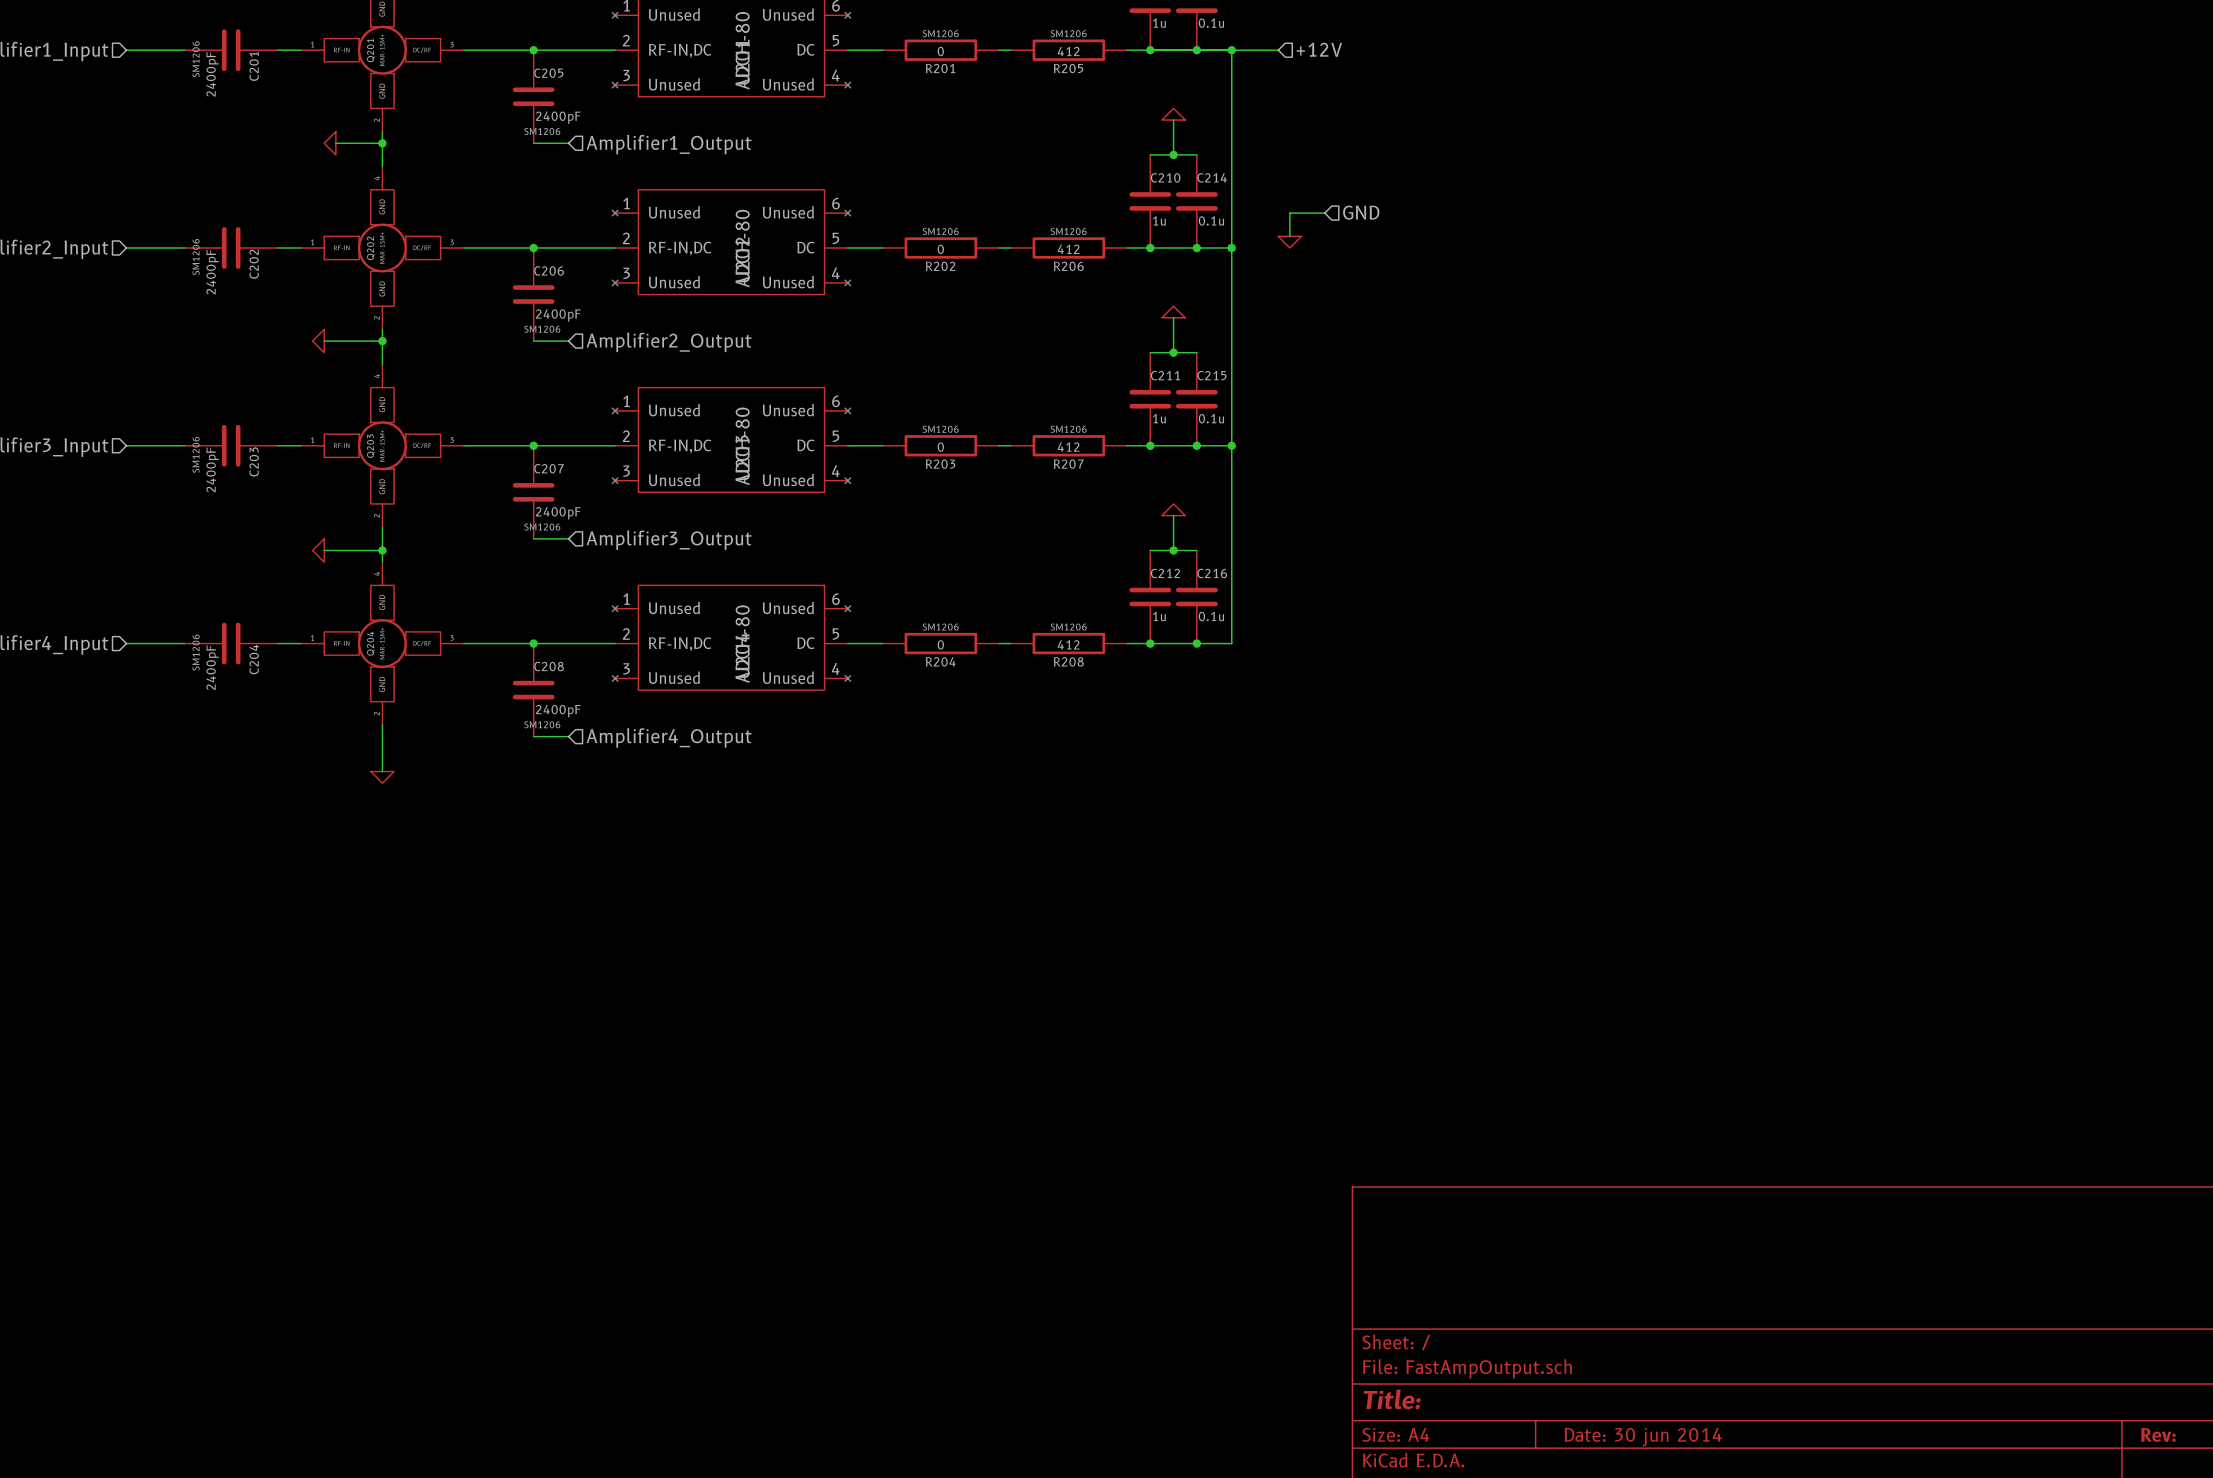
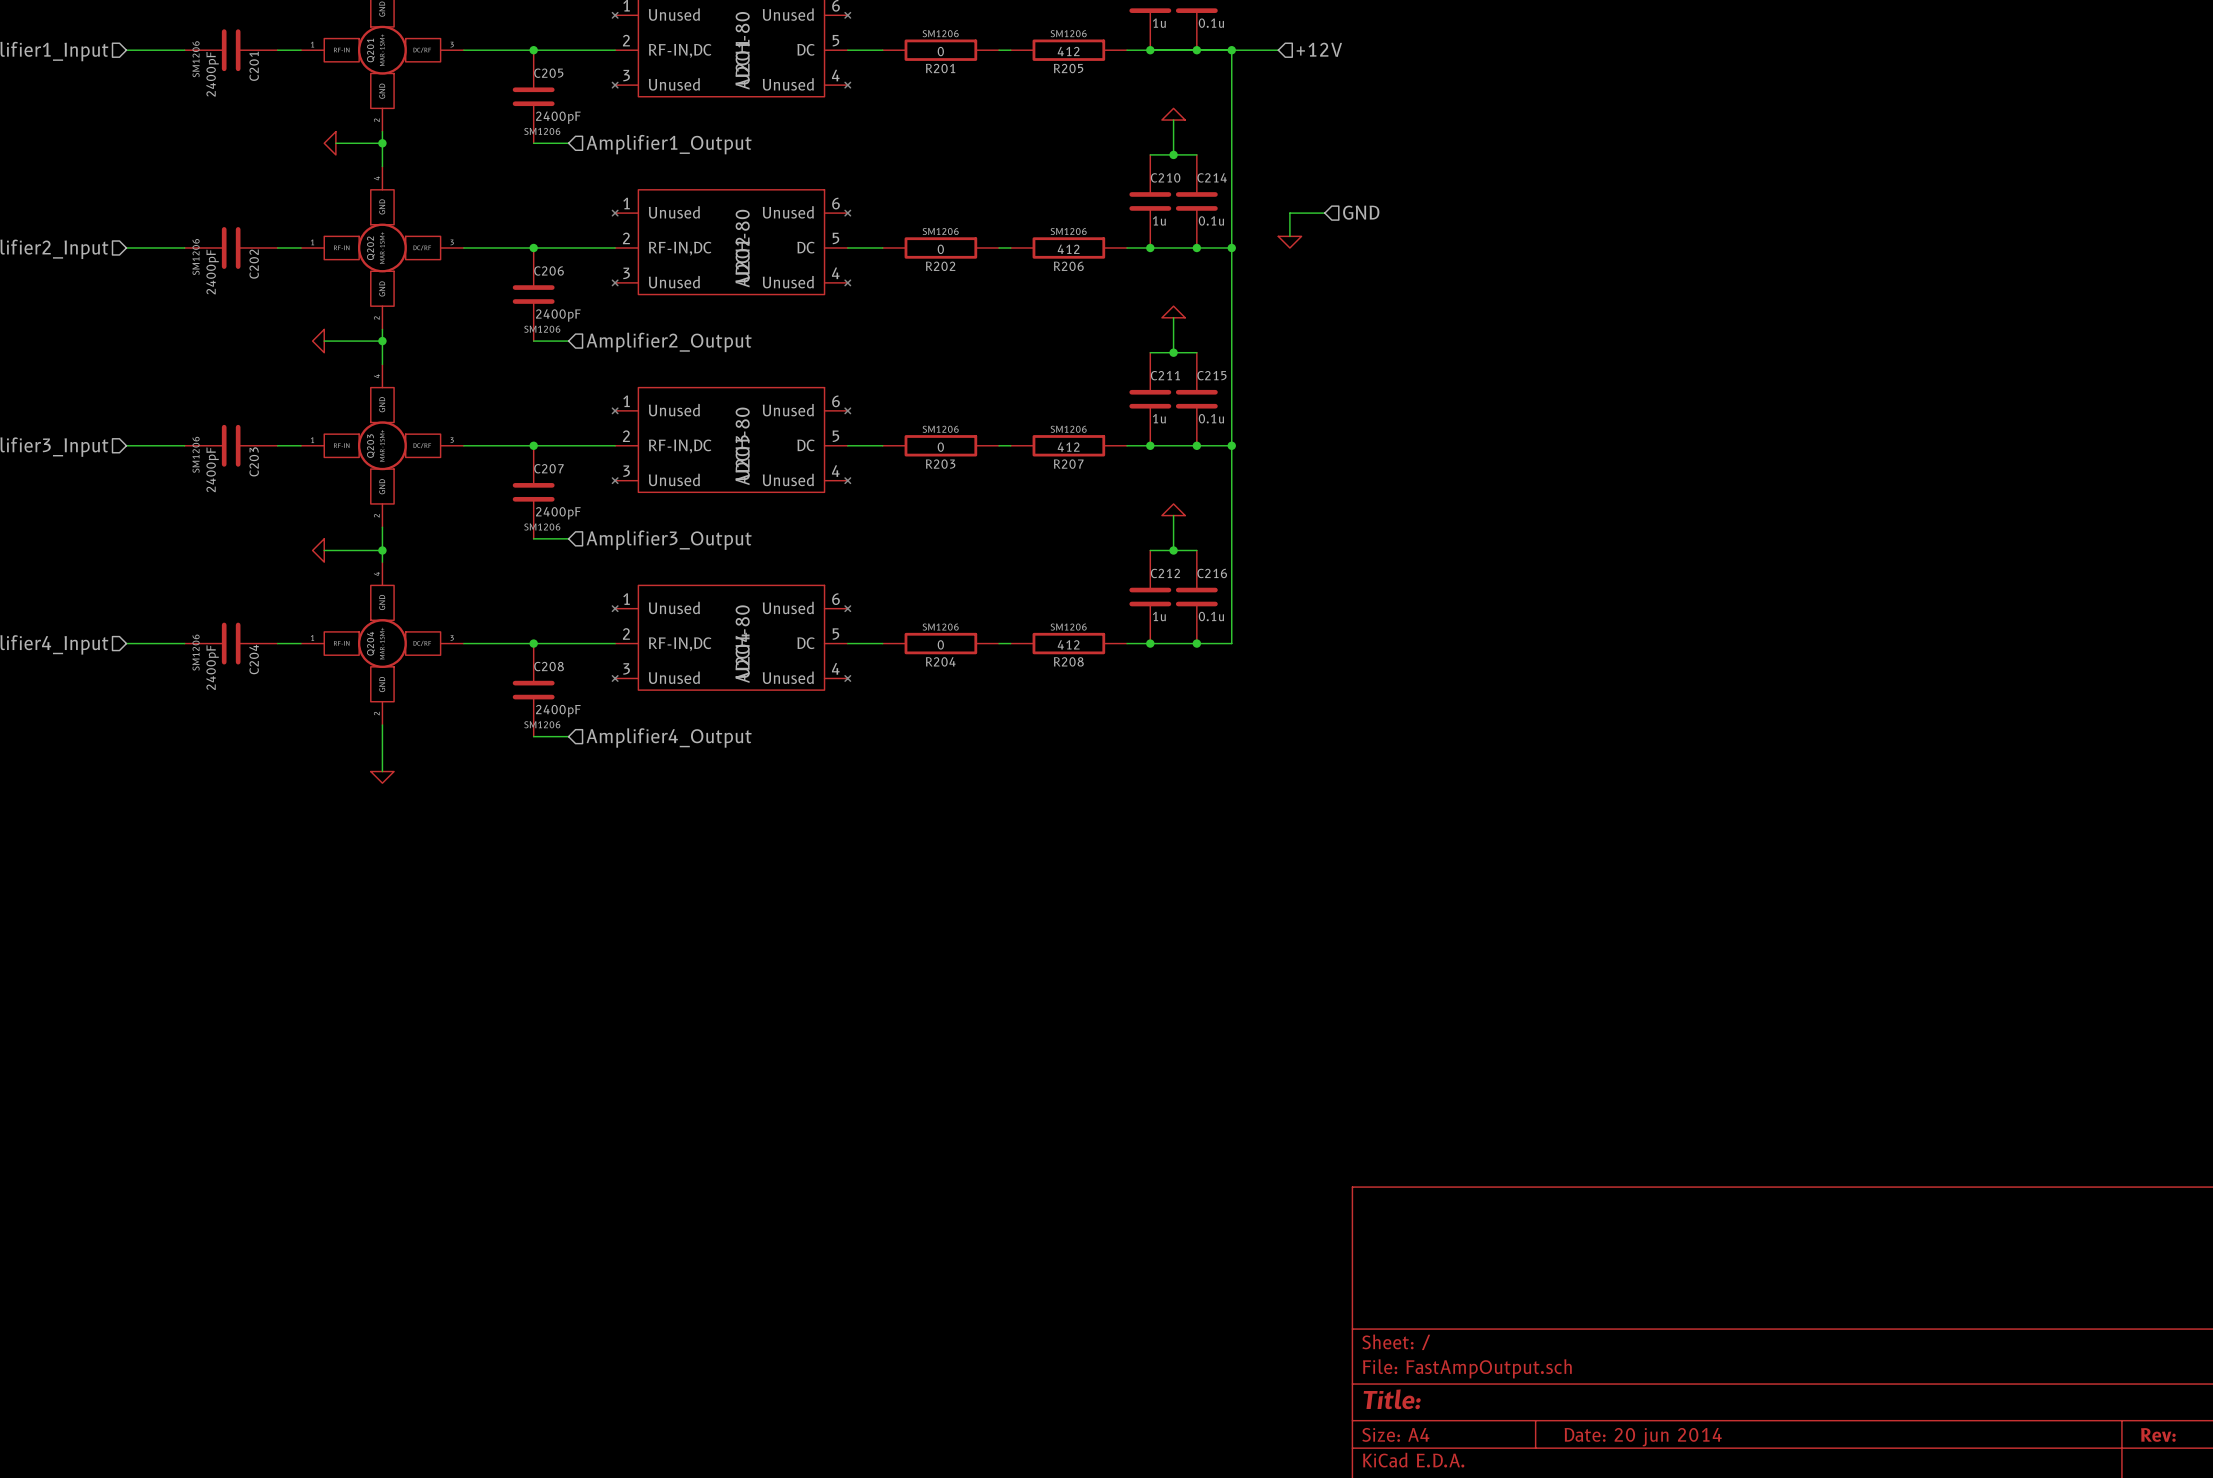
title block: Date: 30 jun 2014 (1643, 1437) -> Date: 20 jun 2014 (1643, 1437)

